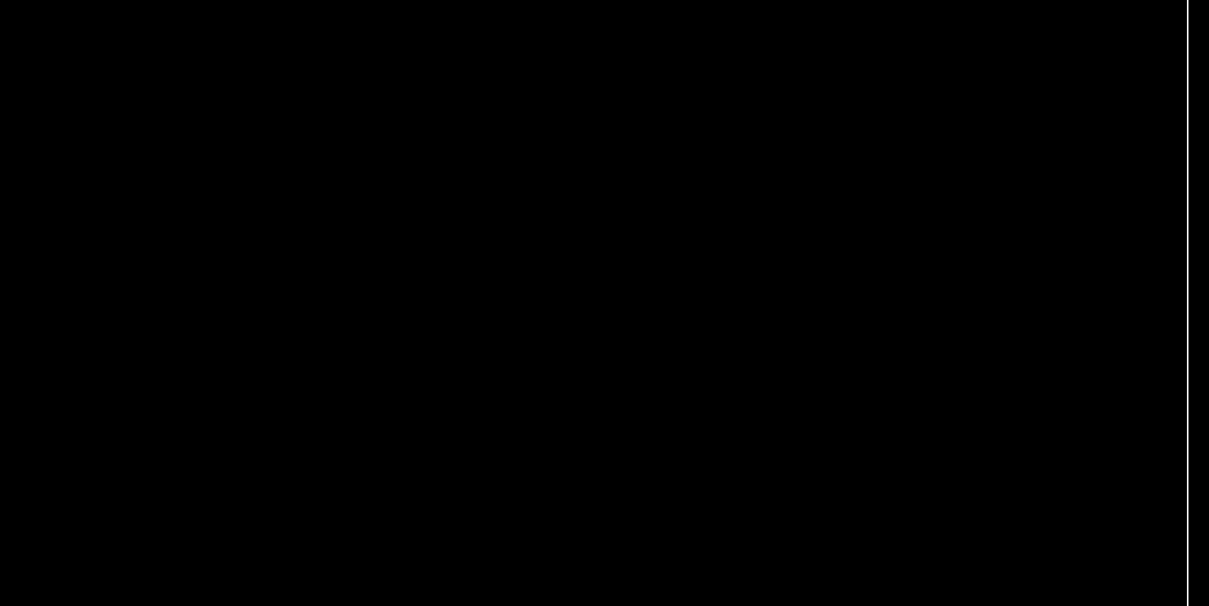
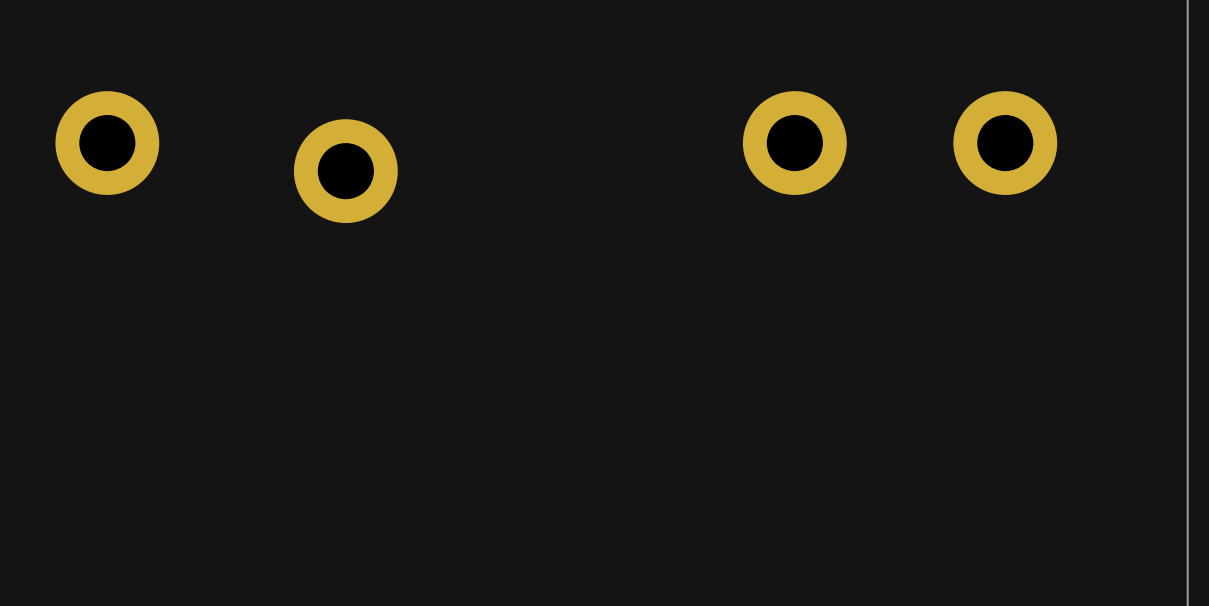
part: none -> (107, 143)
part: none -> (794, 143)
part: none -> (1005, 143)
part: none -> (345, 171)

